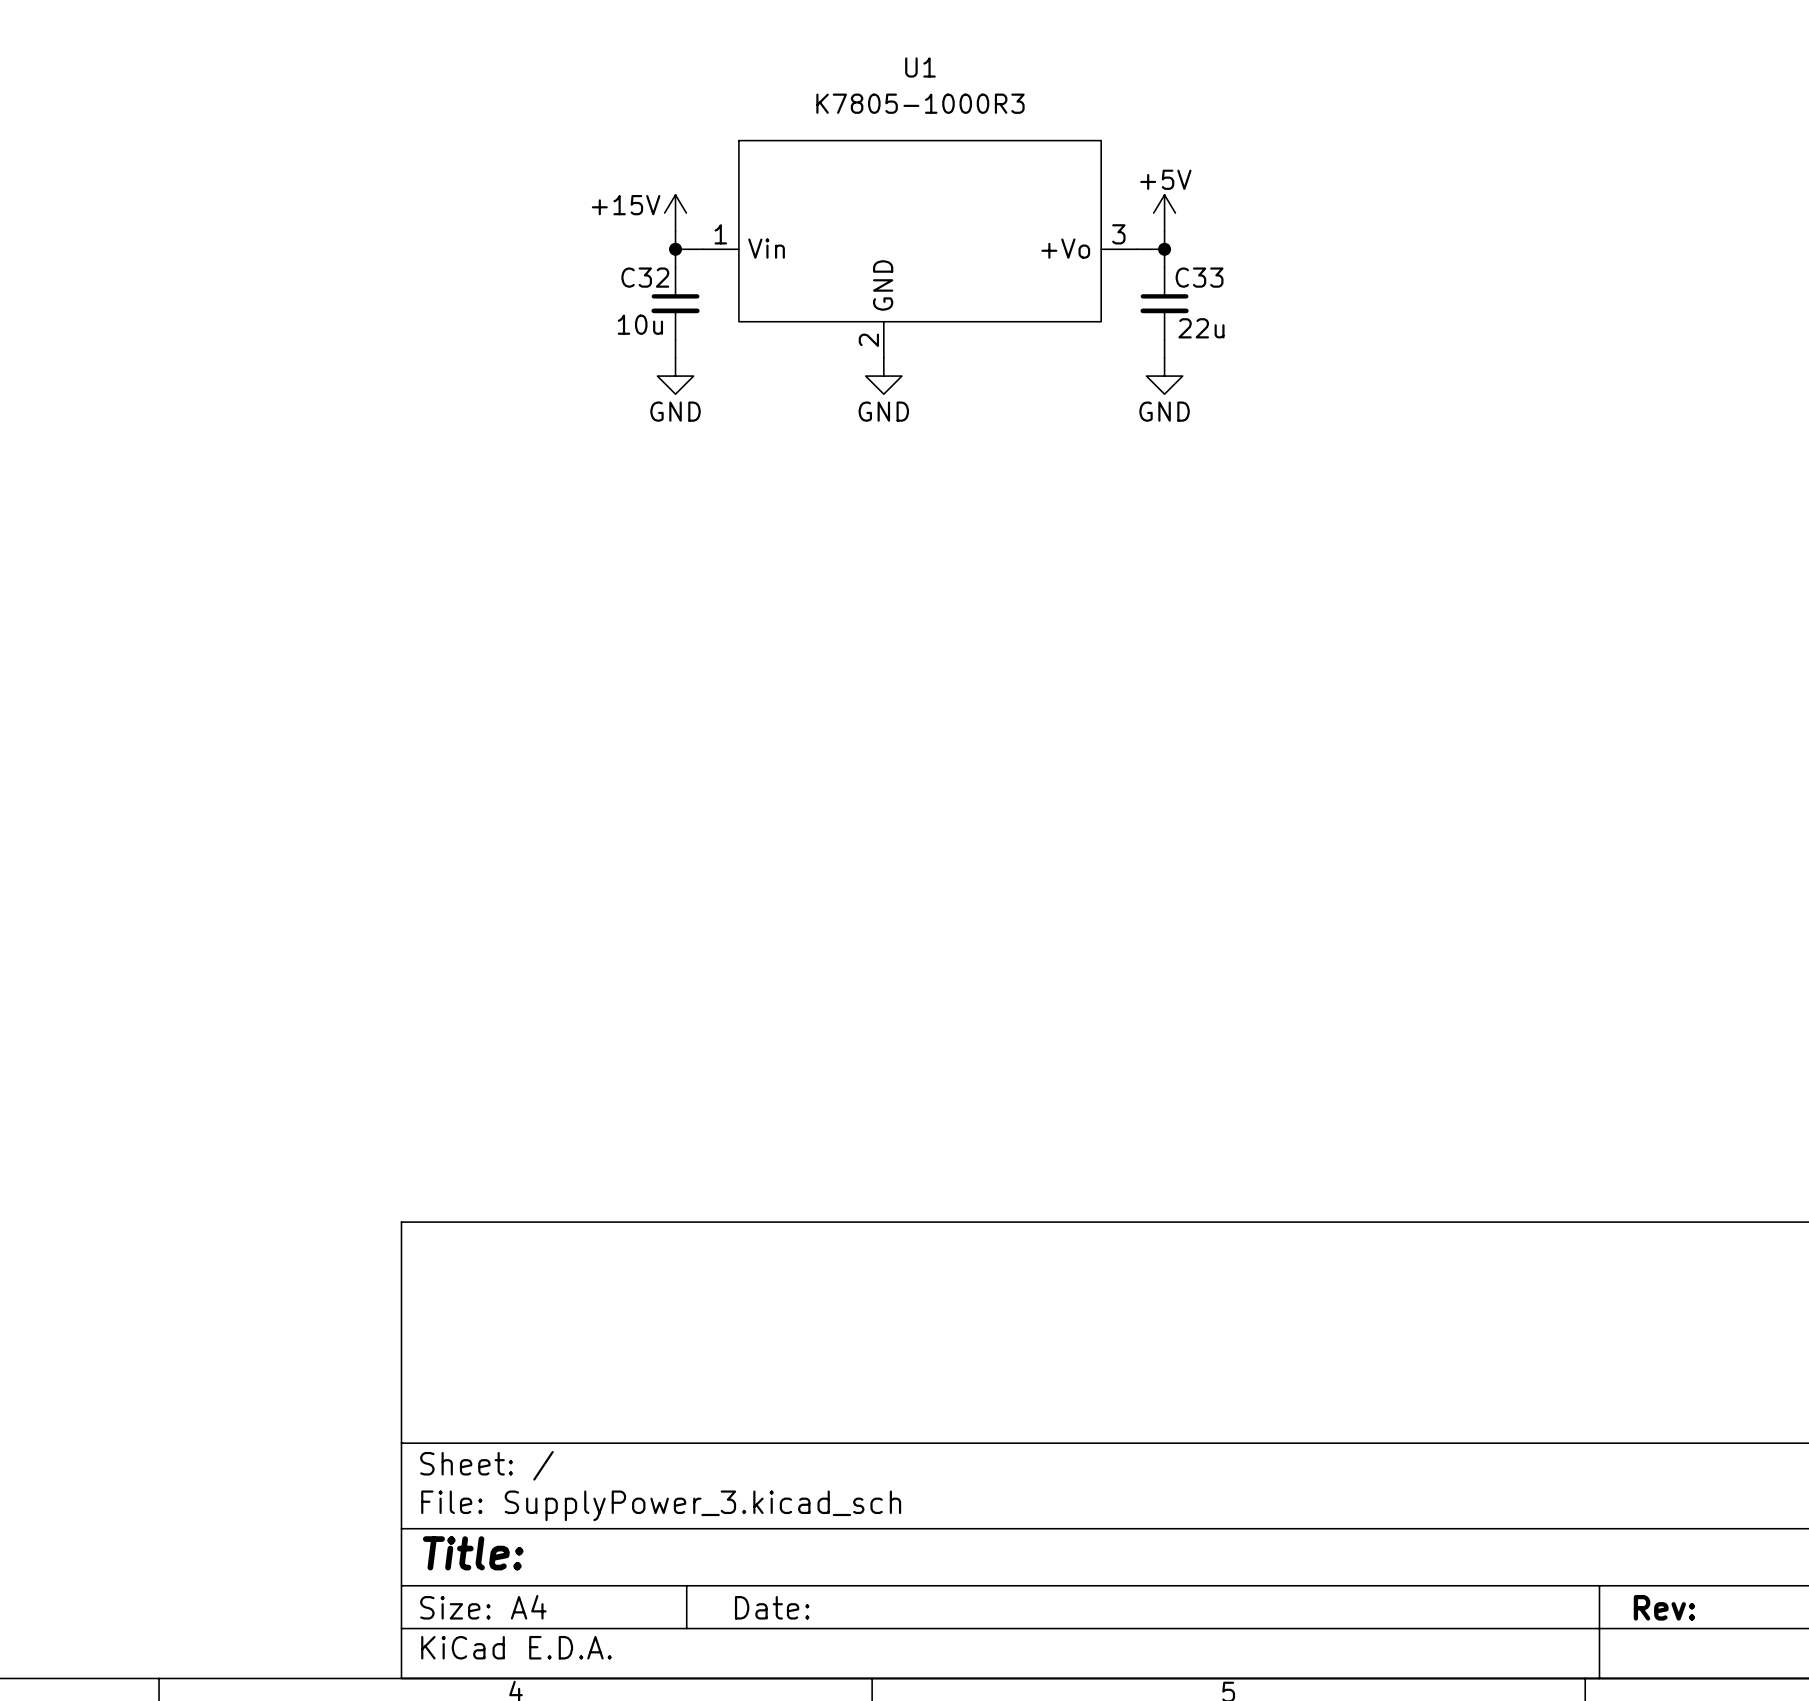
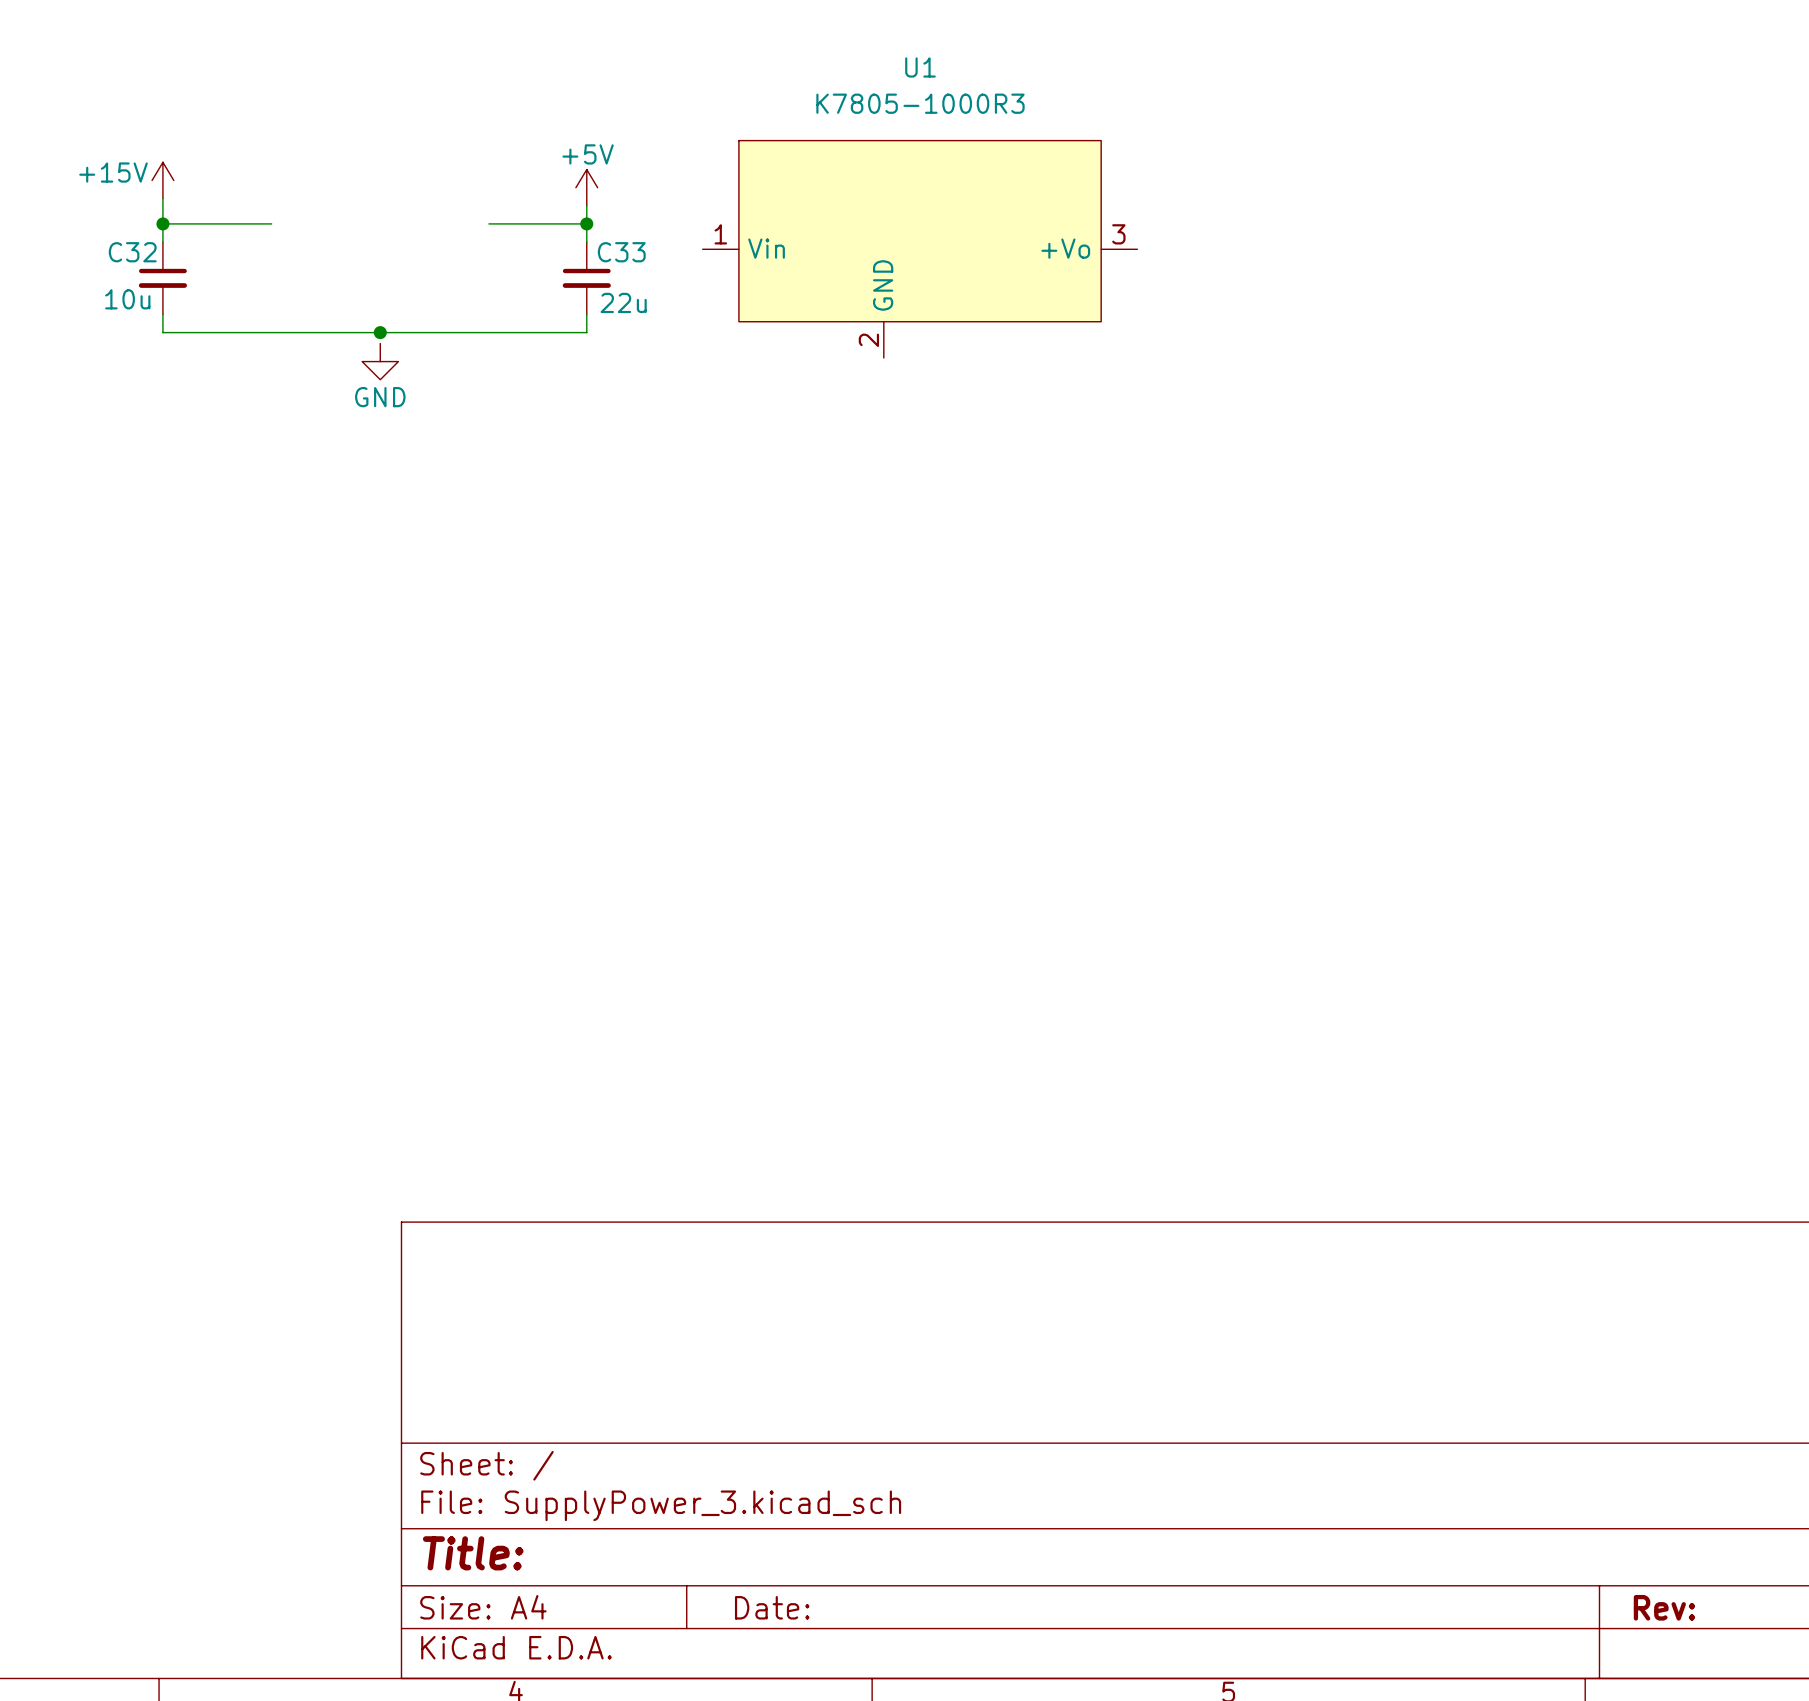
power symbol: none -> +15V (162, 180)
power symbol: none -> +5V (586, 187)
wire: none -> (162, 198) (162, 242)
power symbol: +15V (675, 213) -> none
power symbol: +5V (1164, 213) -> none
wire: none -> (162, 223) (271, 223)
junction: none -> (162, 223)
wire: none -> (488, 223) (586, 223)
junction: none -> (586, 223)
wire: (675, 231) (675, 267) -> (586, 205) (586, 242)
wire: (1164, 231) (1164, 267) -> none
wire: (675, 249) (702, 249) -> none
junction: (675, 249) -> none
wire: (1137, 249) (1164, 249) -> none
junction: (1164, 249) -> none
C32 position: (675, 303) -> (162, 278)
C33 position: (1164, 303) -> (586, 278)
wire: none -> (162, 314) (162, 332) (586, 332) (586, 314)
junction: none -> (380, 332)
wire: (675, 339) (675, 357) -> none
wire: (1164, 339) (1164, 357) -> none
power symbol: none -> GND (380, 361)
power symbol: GND (675, 376) -> none
power symbol: GND (883, 376) -> none
power symbol: GND (1164, 376) -> none

